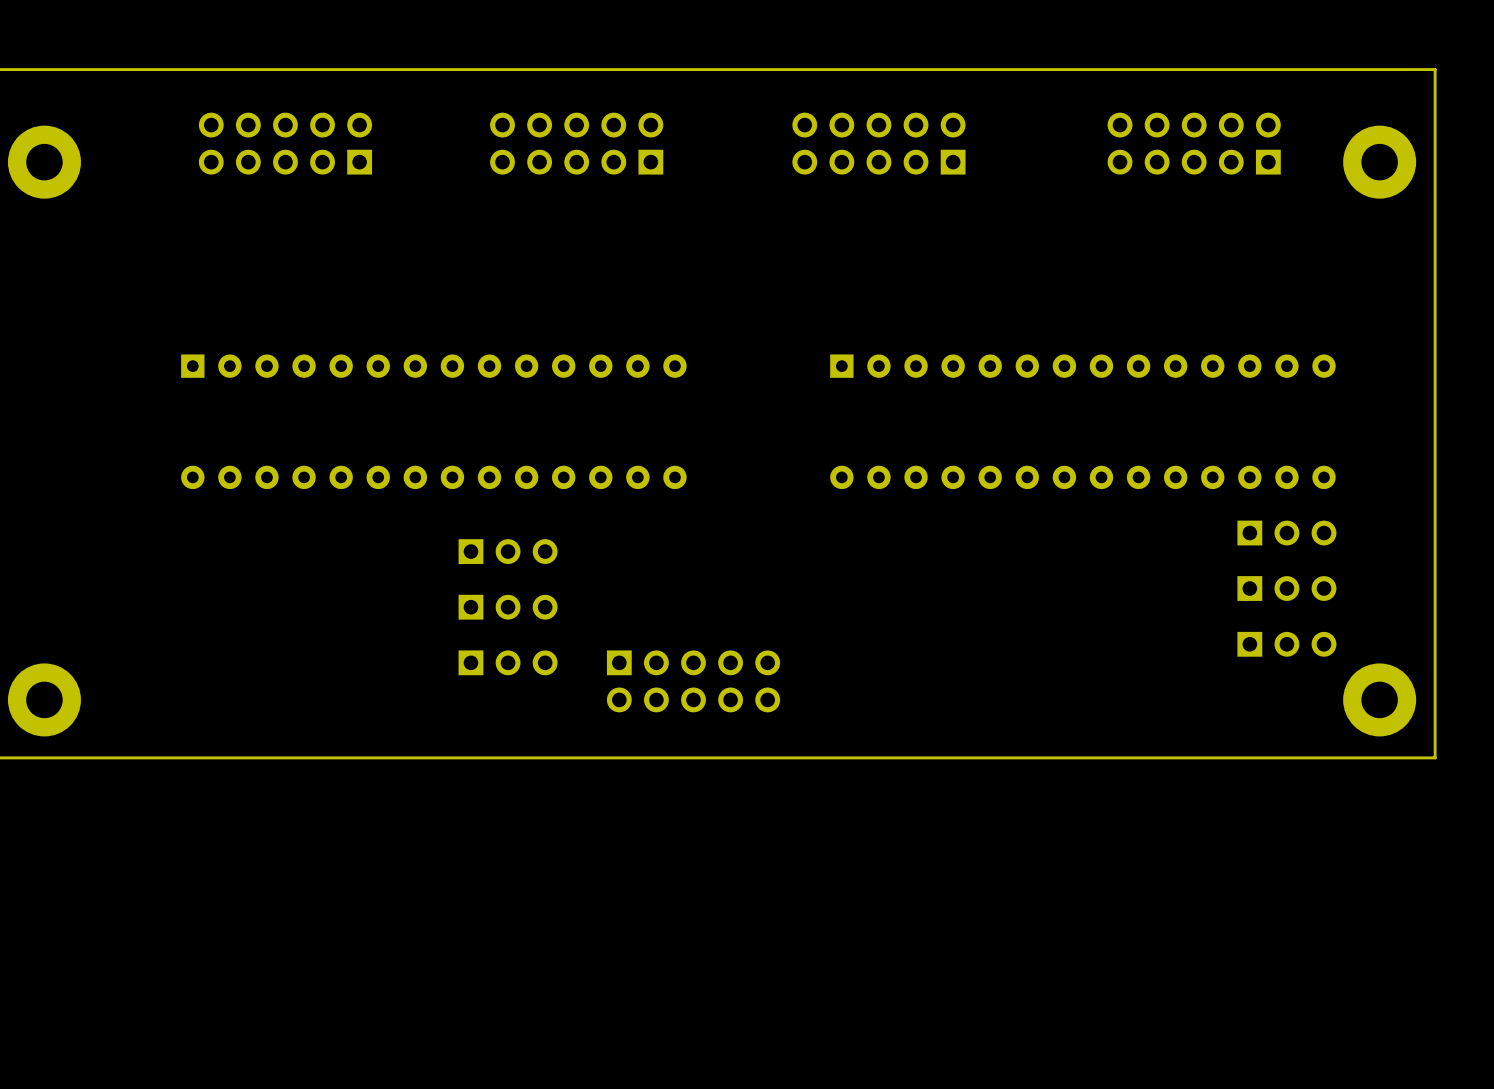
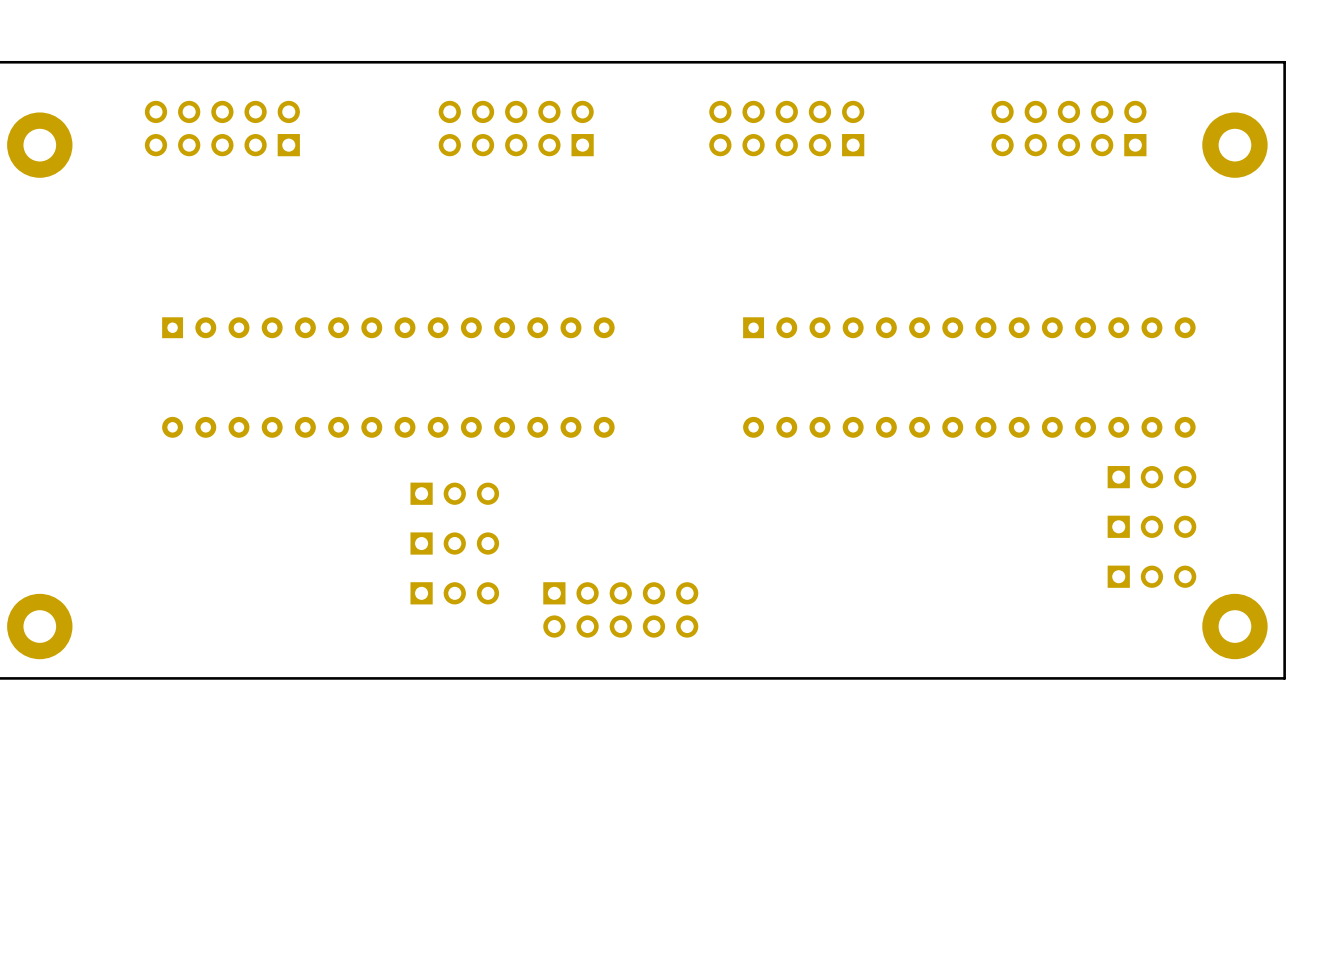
part position: (285, 143) -> (222, 128)

